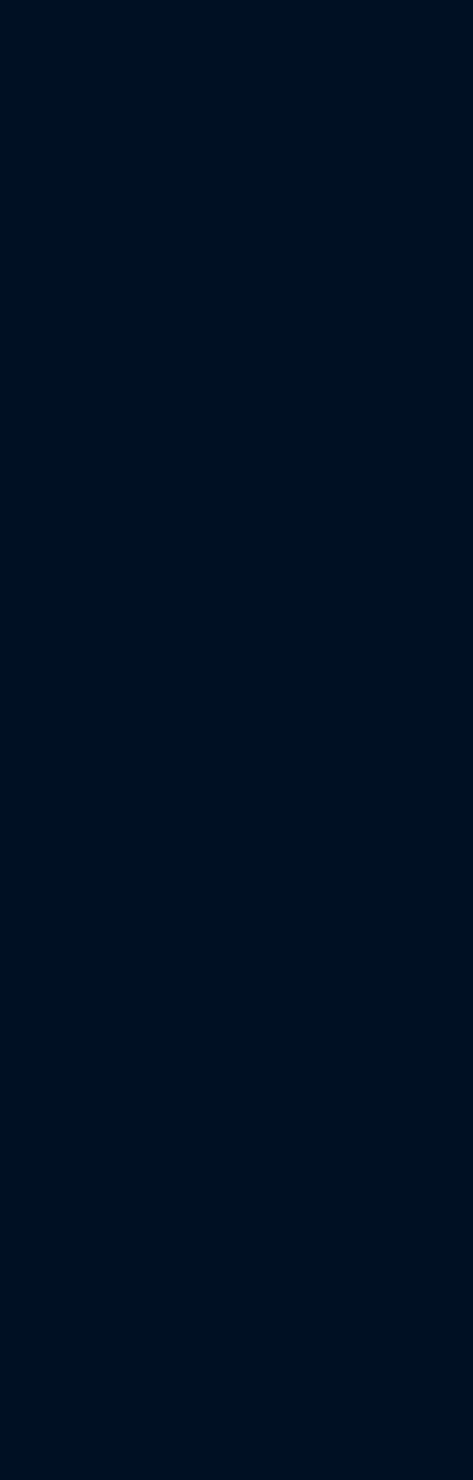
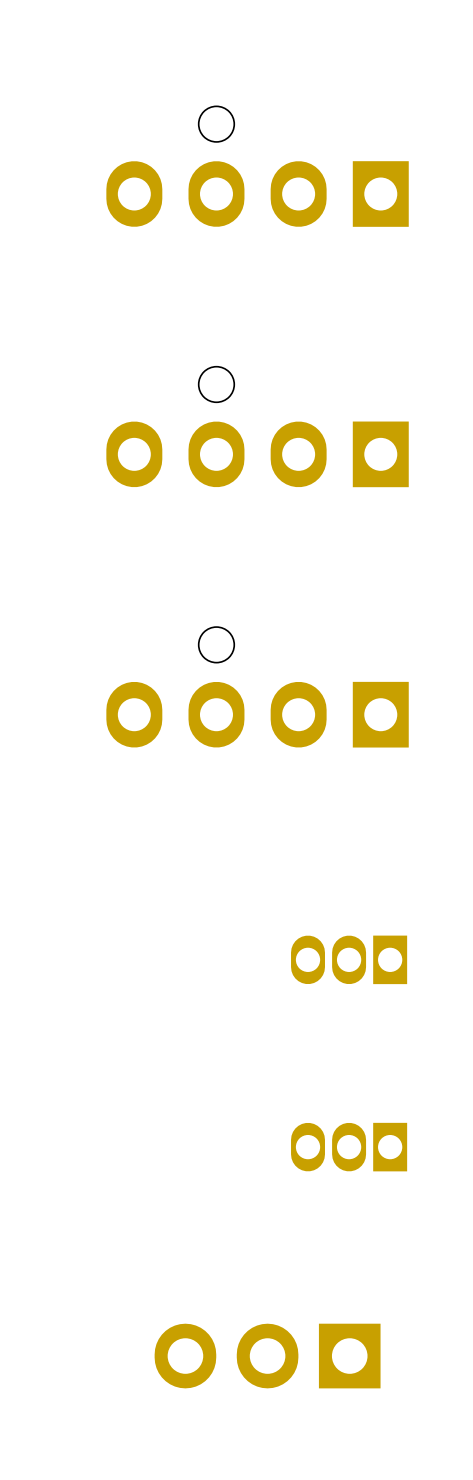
part: none -> (257, 166)
part: none -> (257, 426)
part: none -> (257, 687)
part: none -> (349, 959)
part: none -> (349, 1147)
part: none -> (267, 1356)

